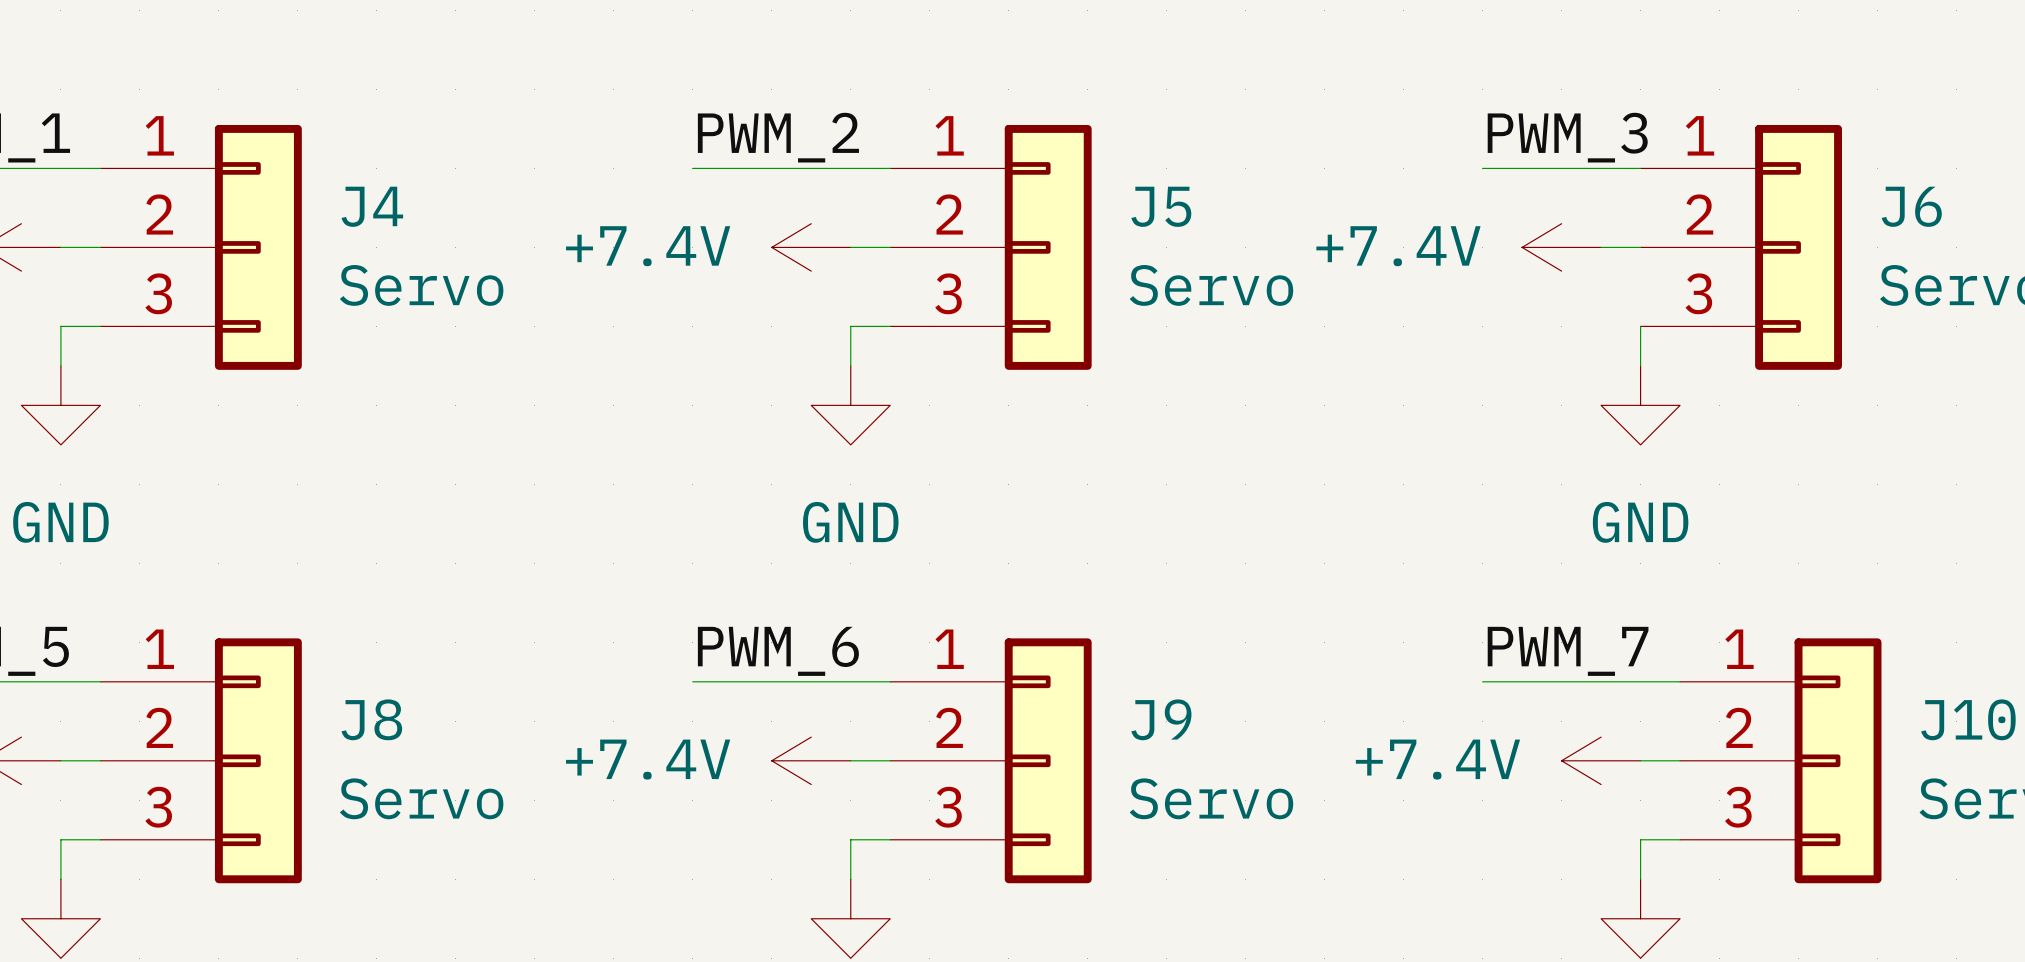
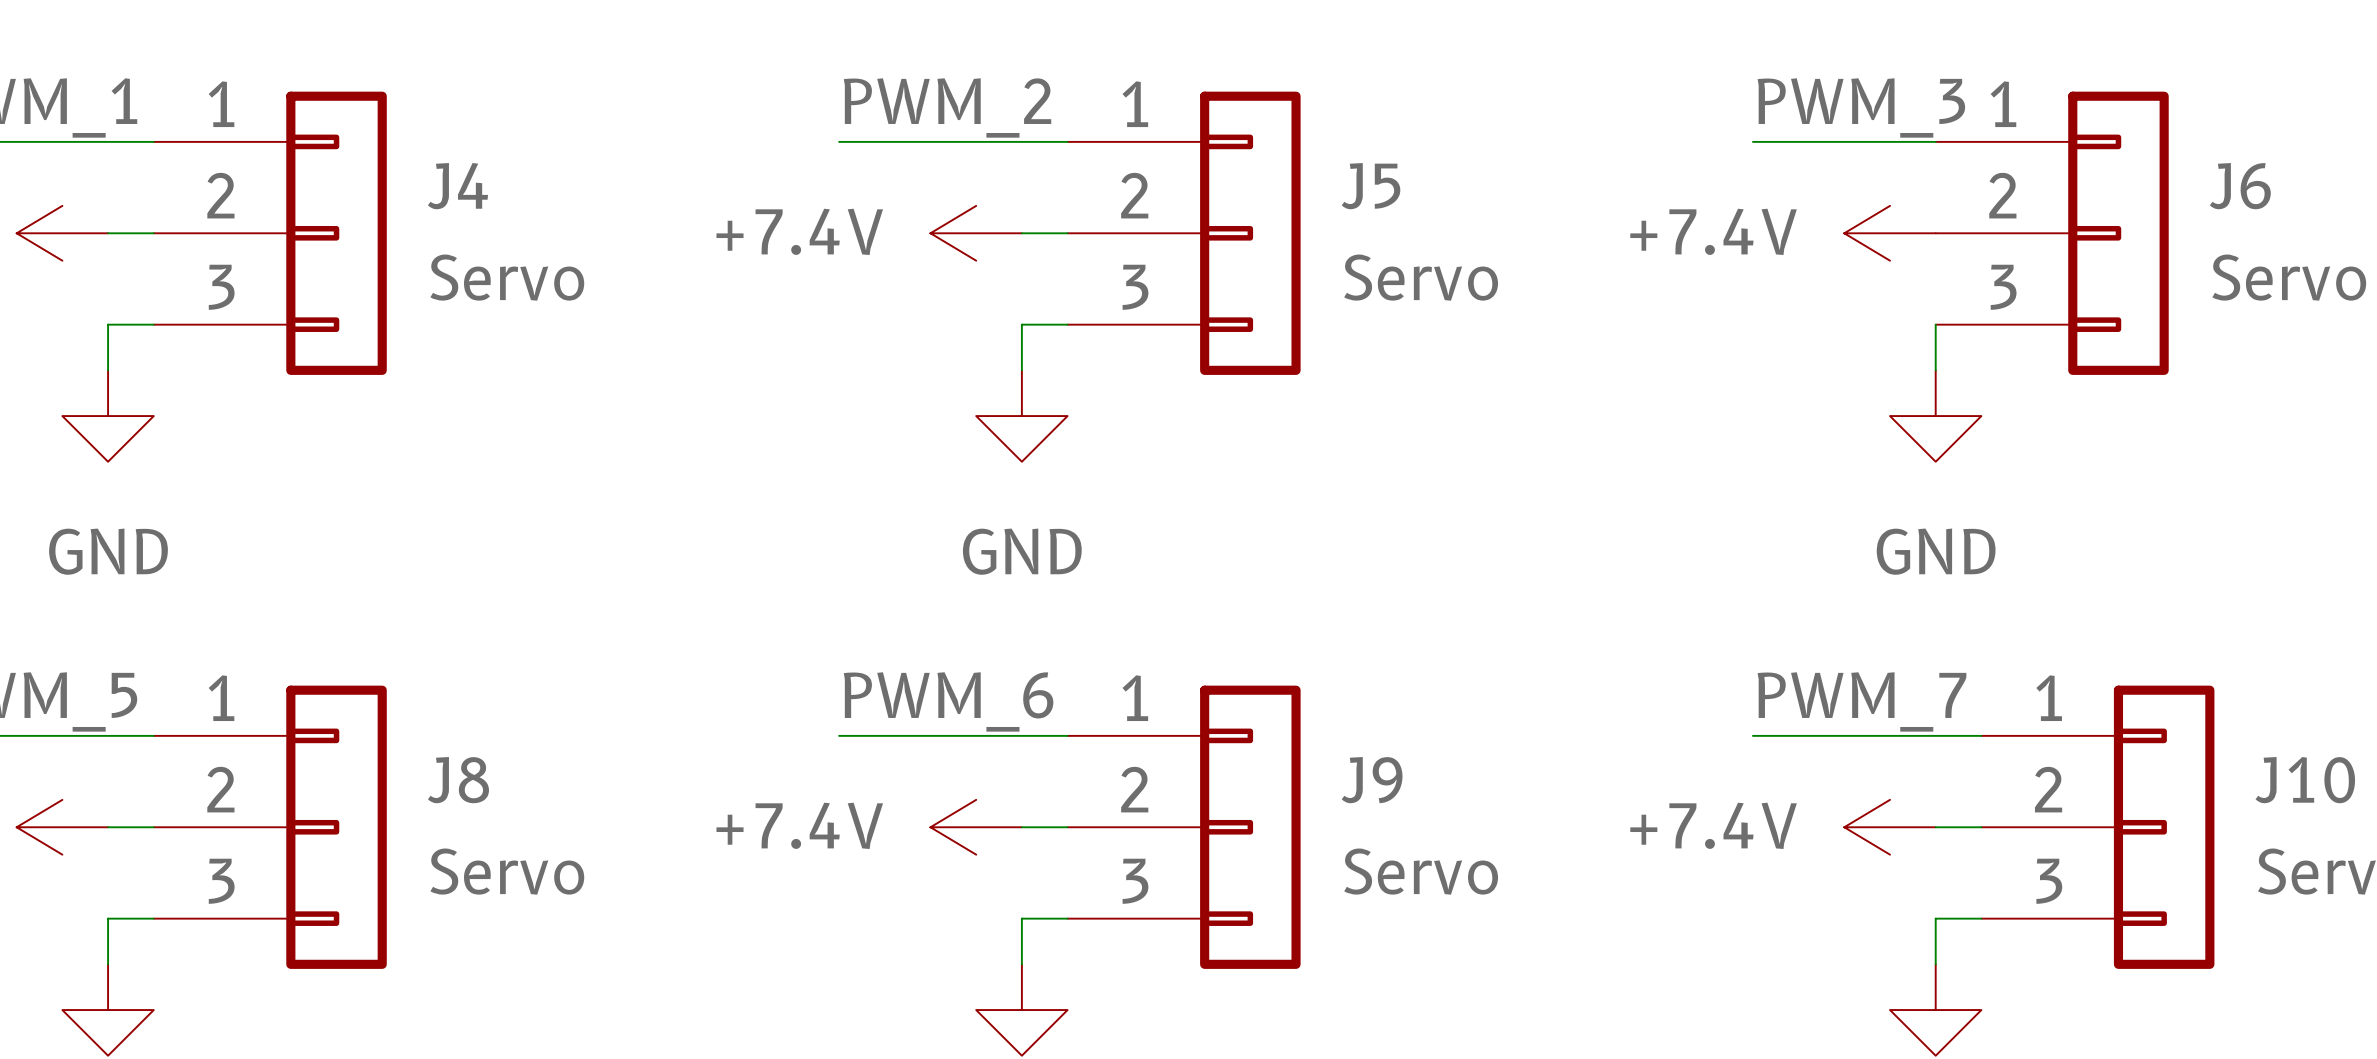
power symbol position: +7.4V (1561, 247) -> +7.4V (1890, 233)

